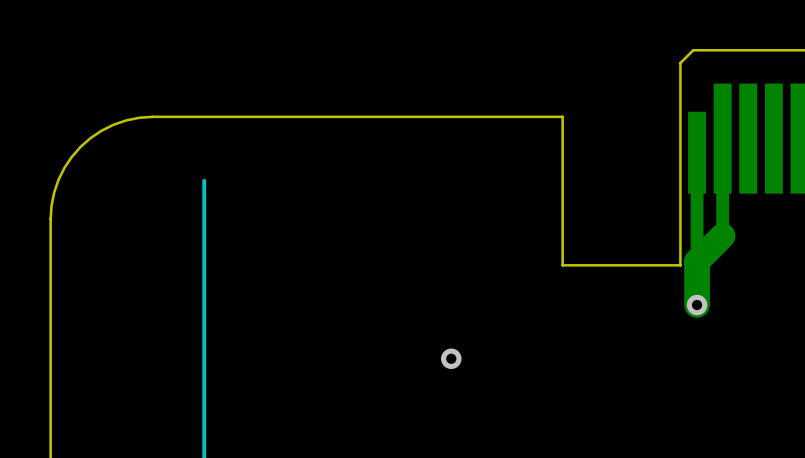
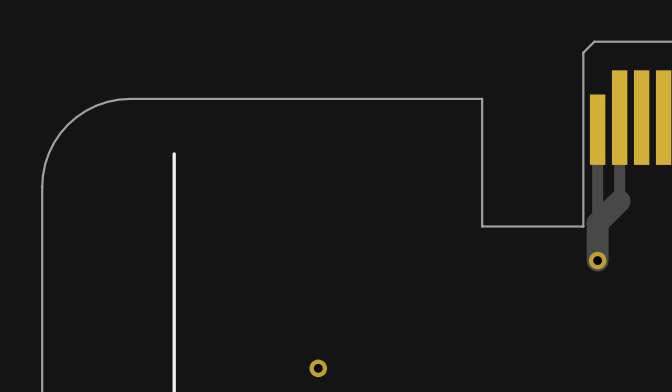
via position: (451, 358) -> (318, 368)

